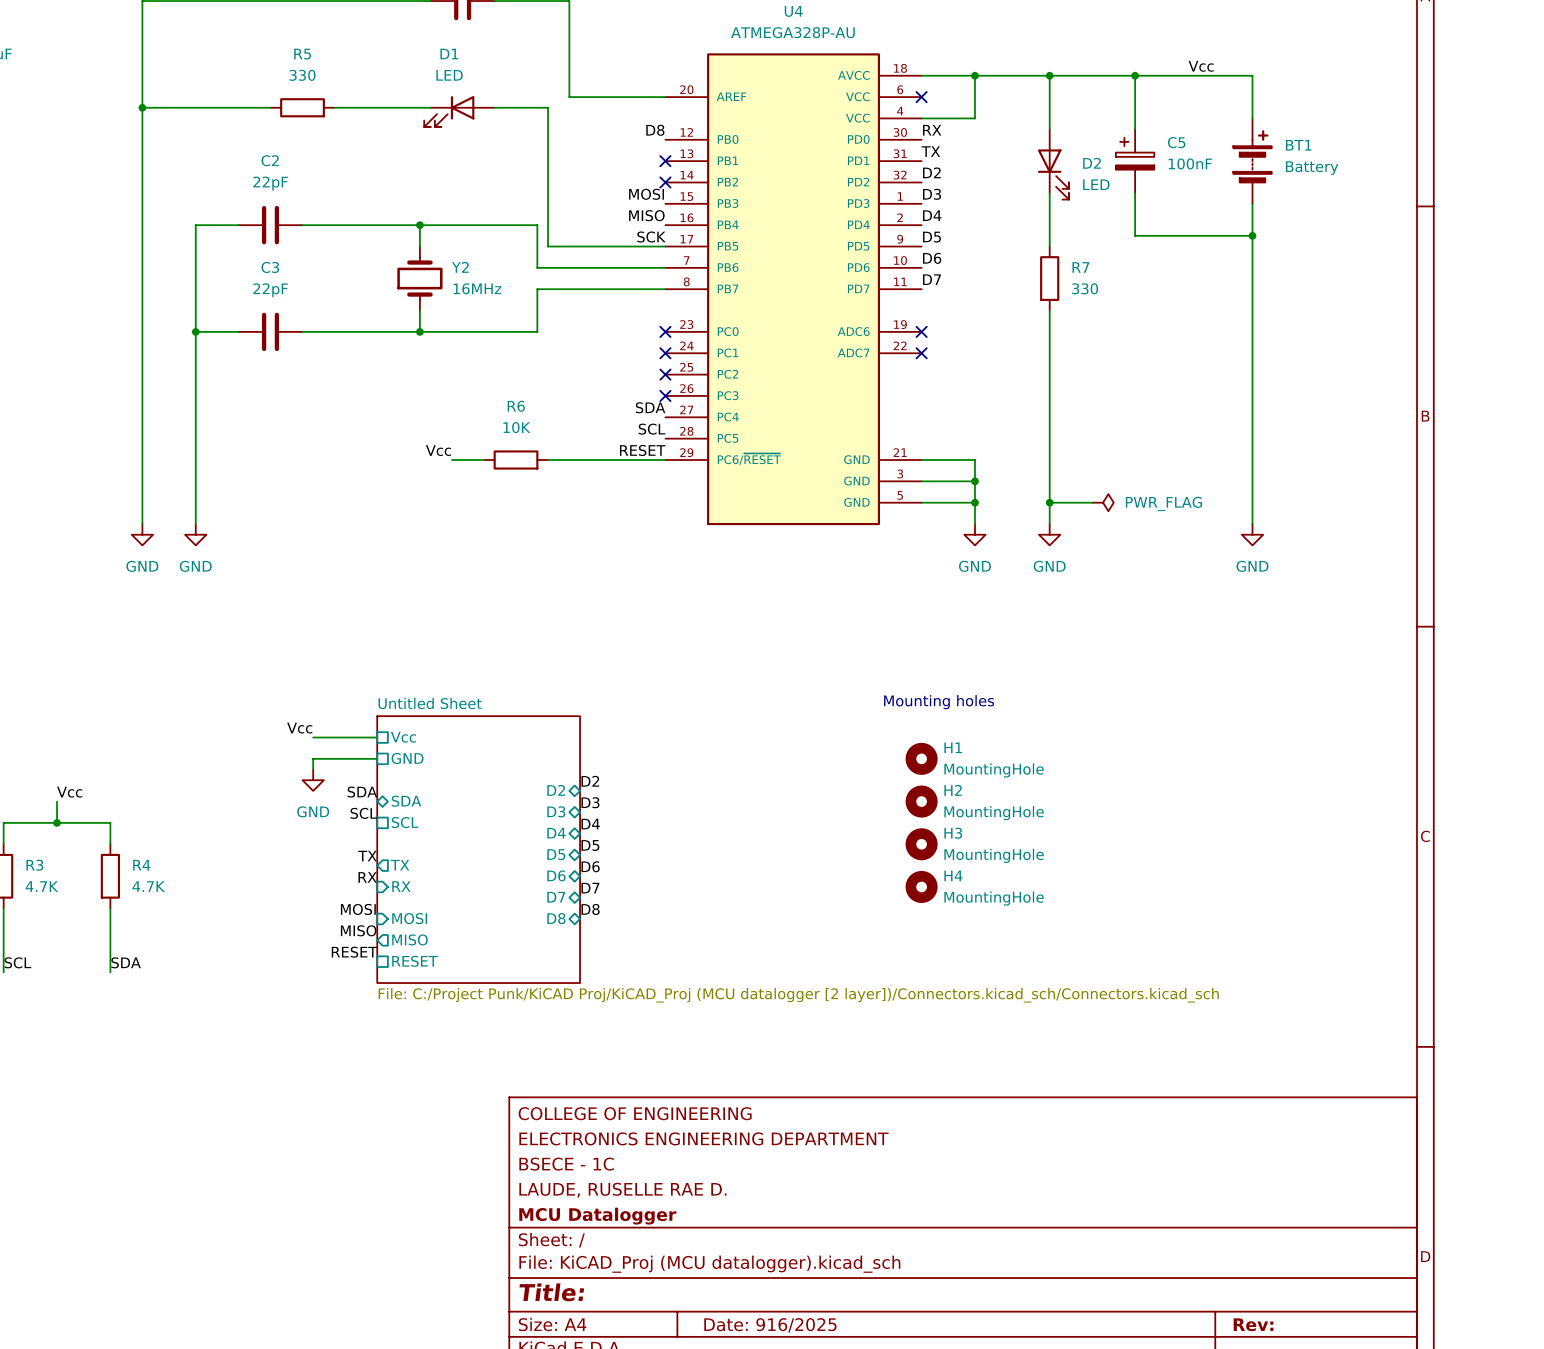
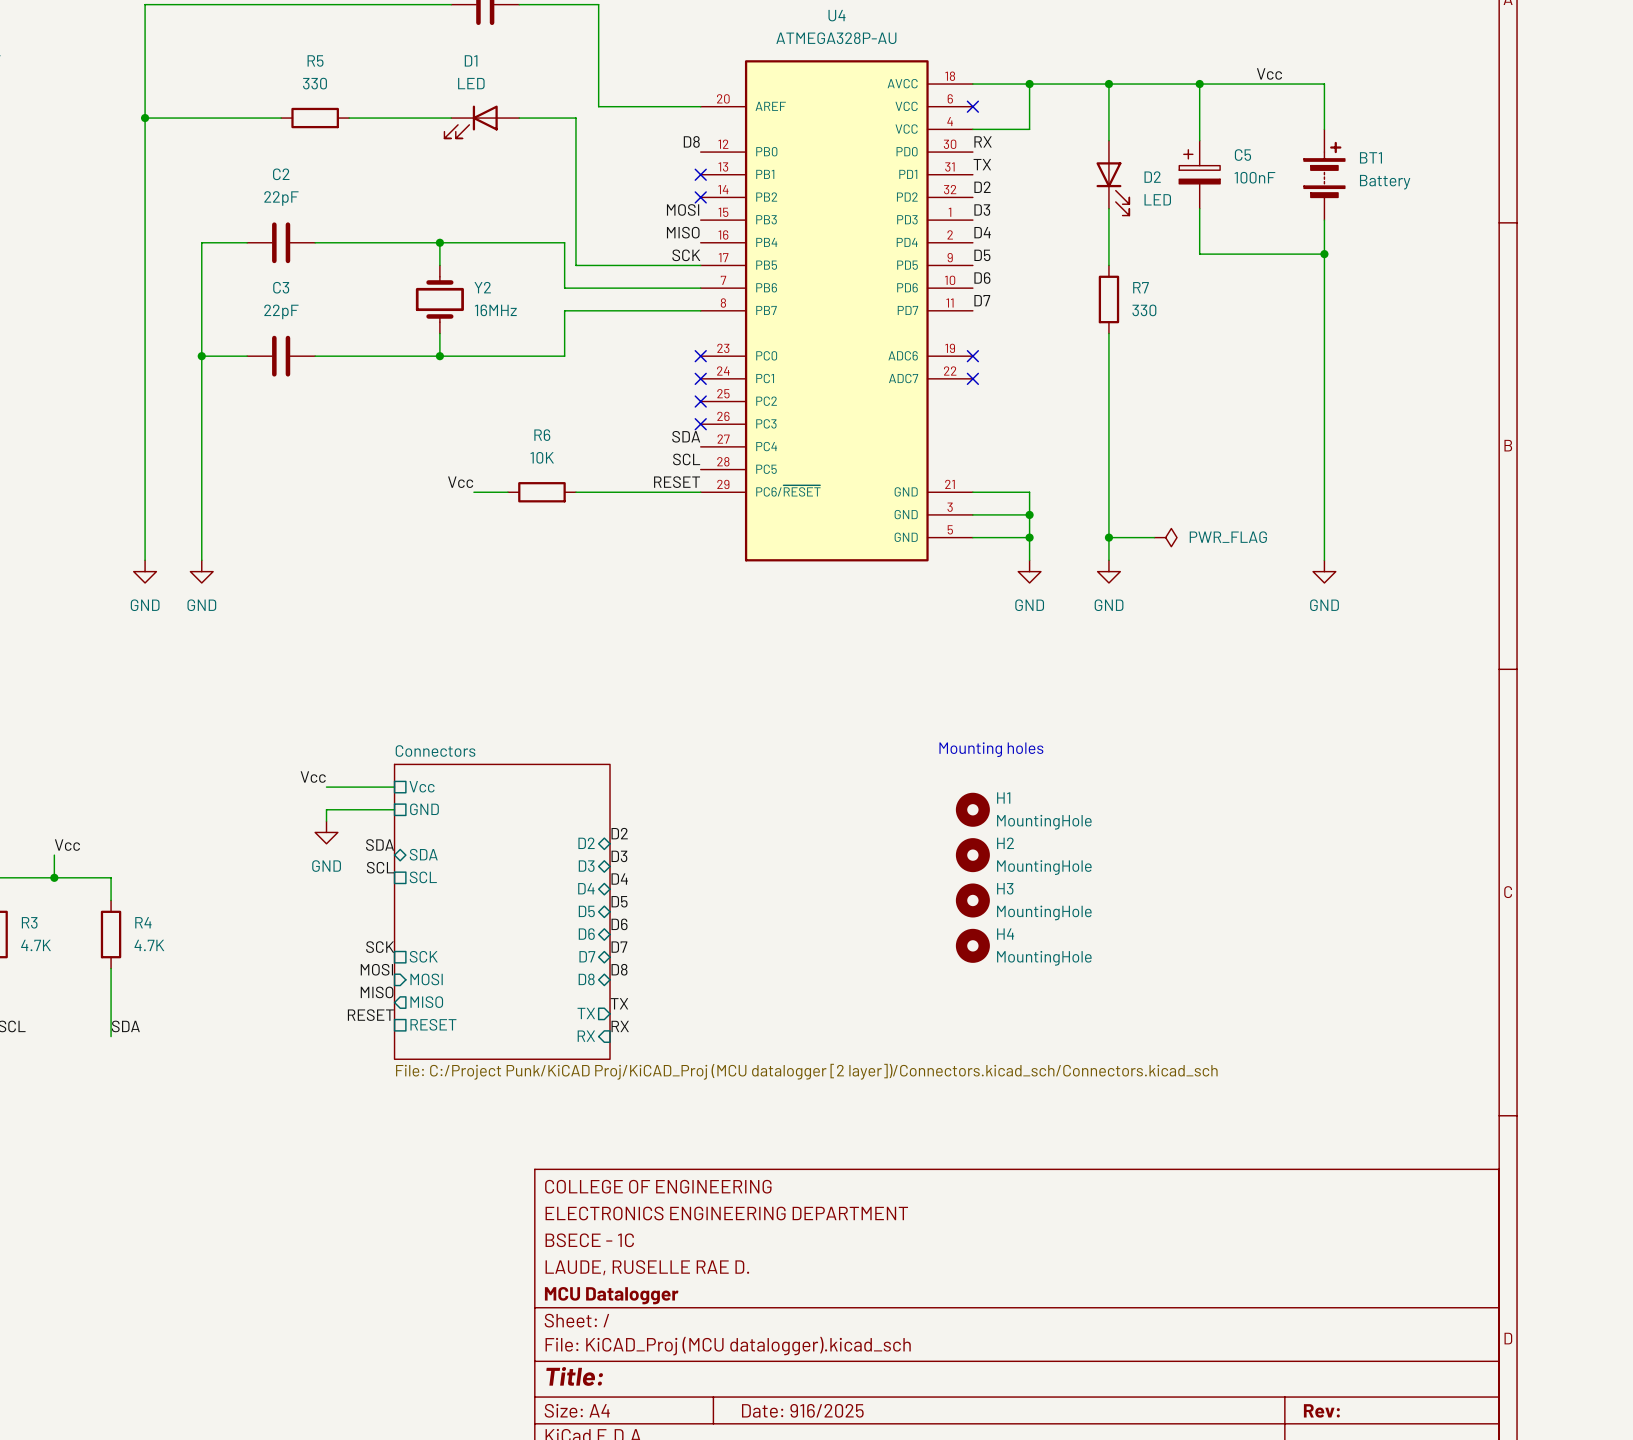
sheet Untitled Sheet: File: C:/Project Punk/KiCAD Proj/KiCAD_Proj (MCU datalogger [2 layer])/Connectors.kicad_sch/Connectors.kicad_sch (478, 849) -> none
sheet Connectors: none -> File: C:/Project Punk/KiCAD Proj/KiCAD_Proj (MCU datalogger [2 layer])/Connectors.kicad_sch/Connectors.kicad_sch (502, 911)
label: TX (367, 856) -> none
sheet pin rotation: 0° (400, 865) -> 180° (586, 1013)
sheet pin position: TX (400, 865) -> TX (586, 1013)
label: RX (367, 877) -> none
sheet pin rotation: 0° (401, 886) -> 180° (586, 1036)
sheet pin position: RX (401, 886) -> RX (586, 1036)
label: none -> SCK (380, 947)
sheet pin: none -> SCK (423, 956)
label: none -> TX (619, 1003)
label: none -> RX (620, 1026)

